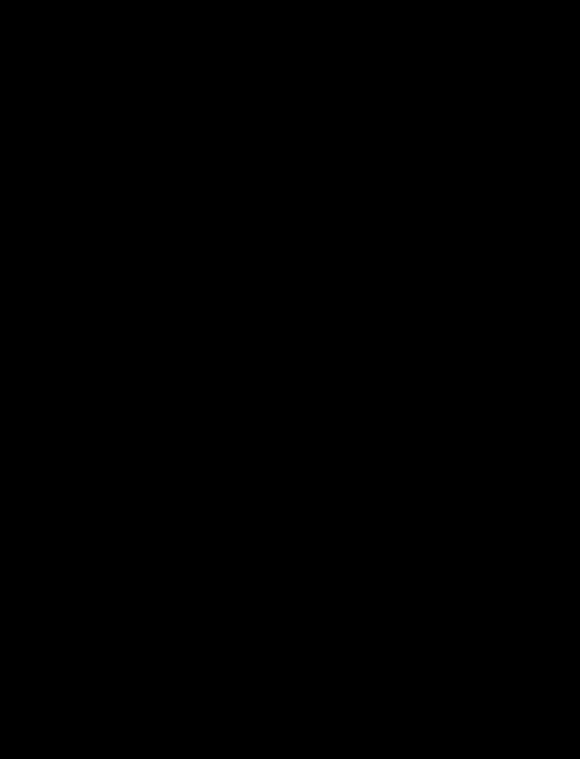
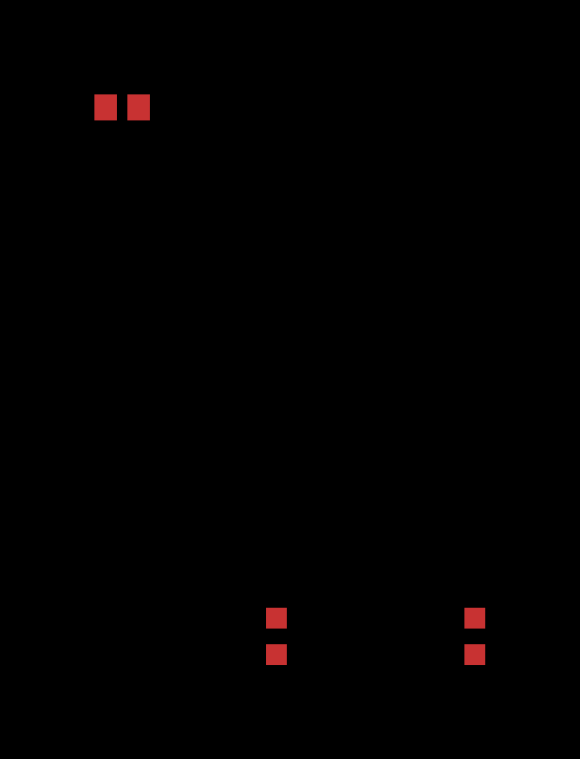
part: none -> (122, 107)
part: none -> (276, 636)
part: none -> (474, 636)

